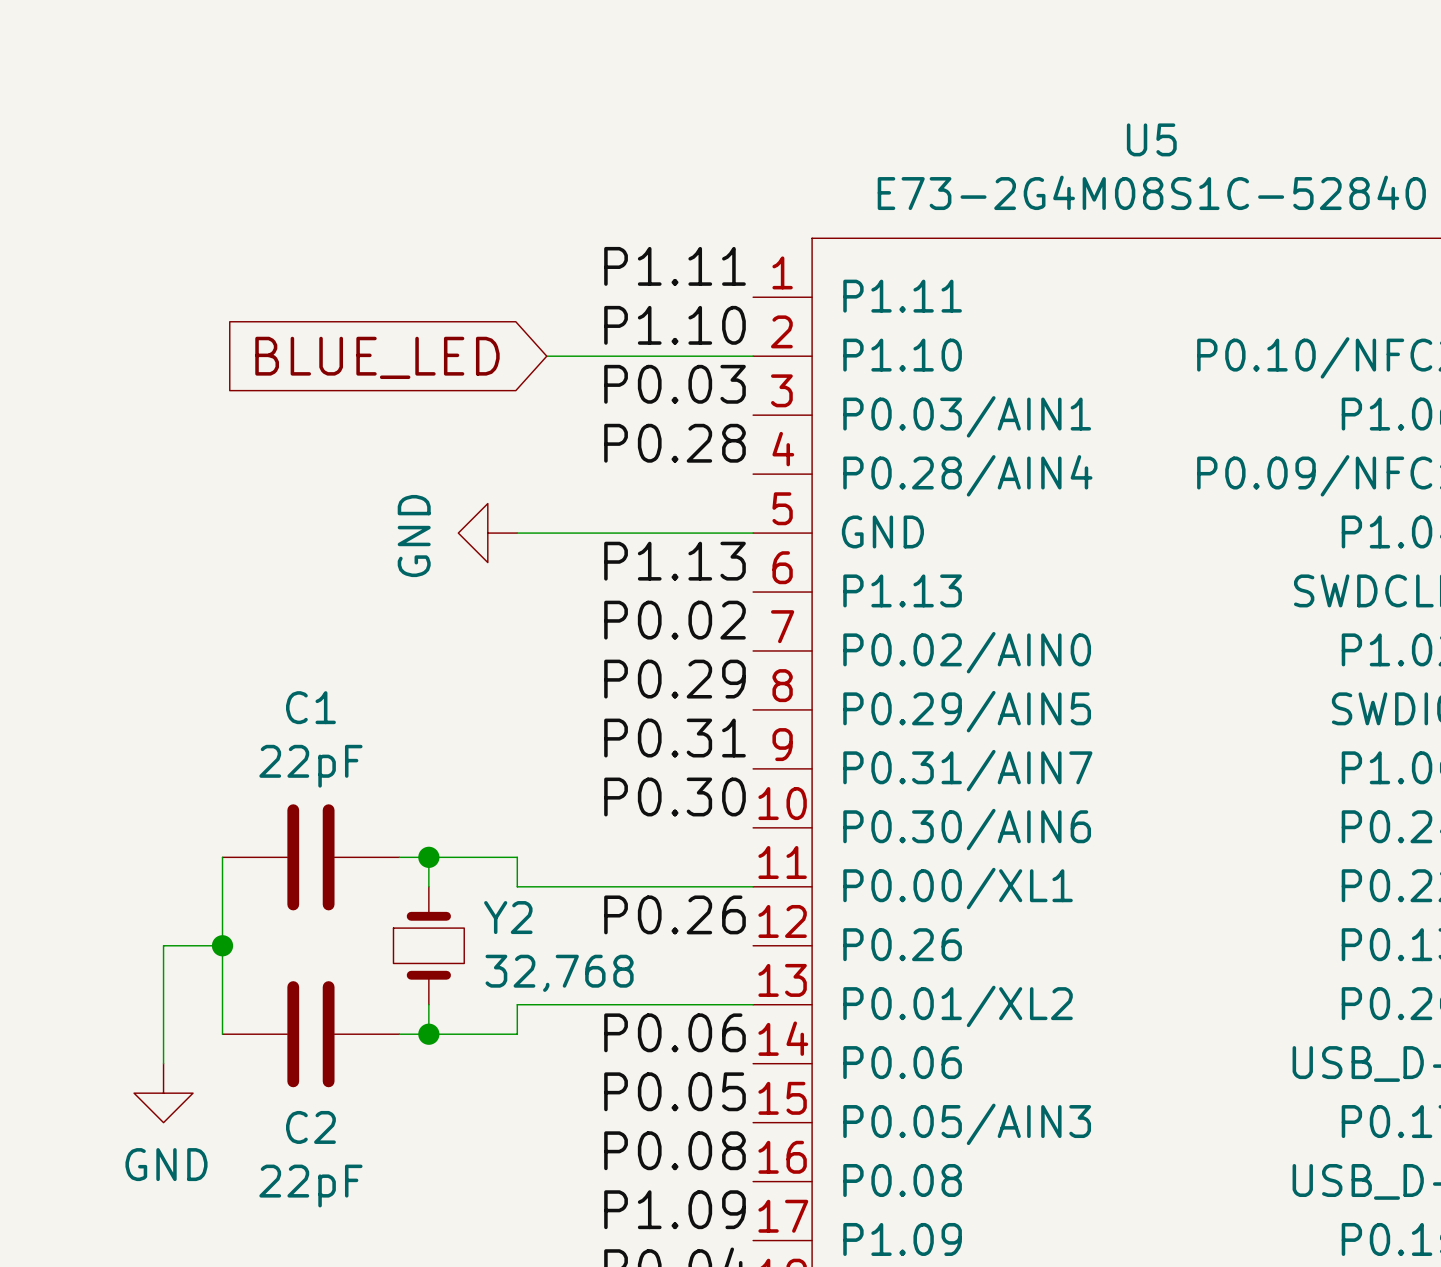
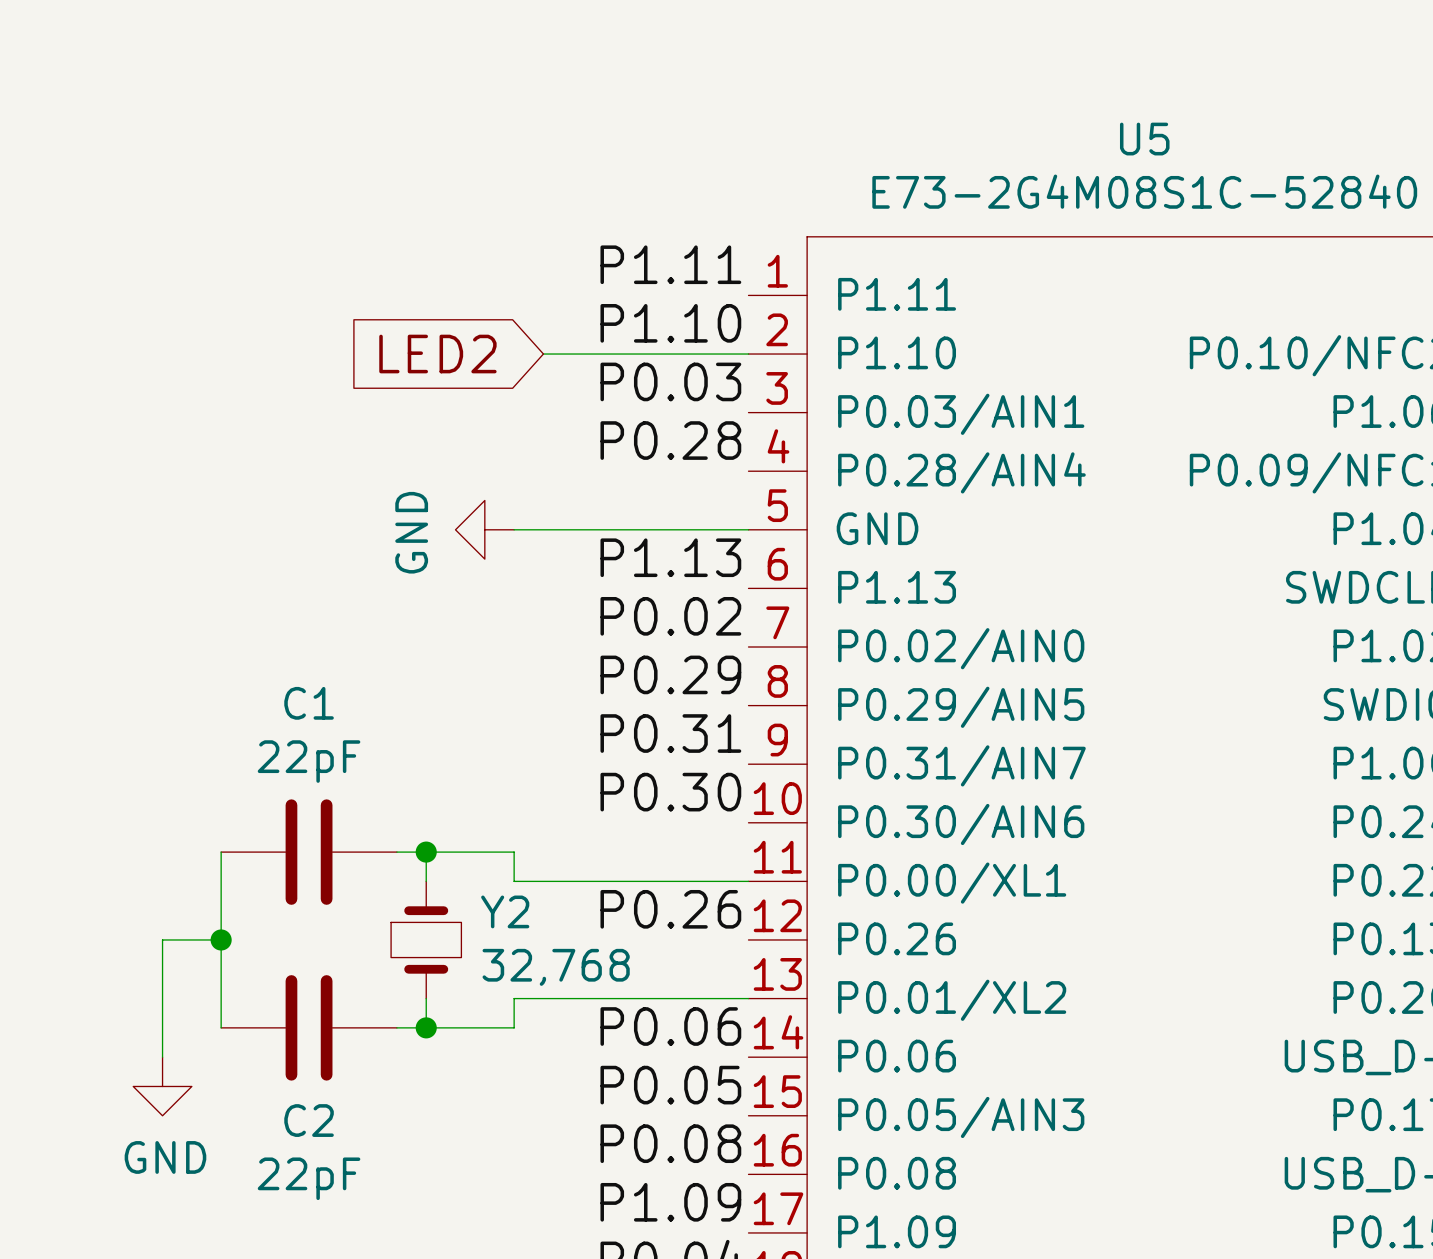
global label: BLUE_LED (377, 357) -> LED2 (437, 354)

